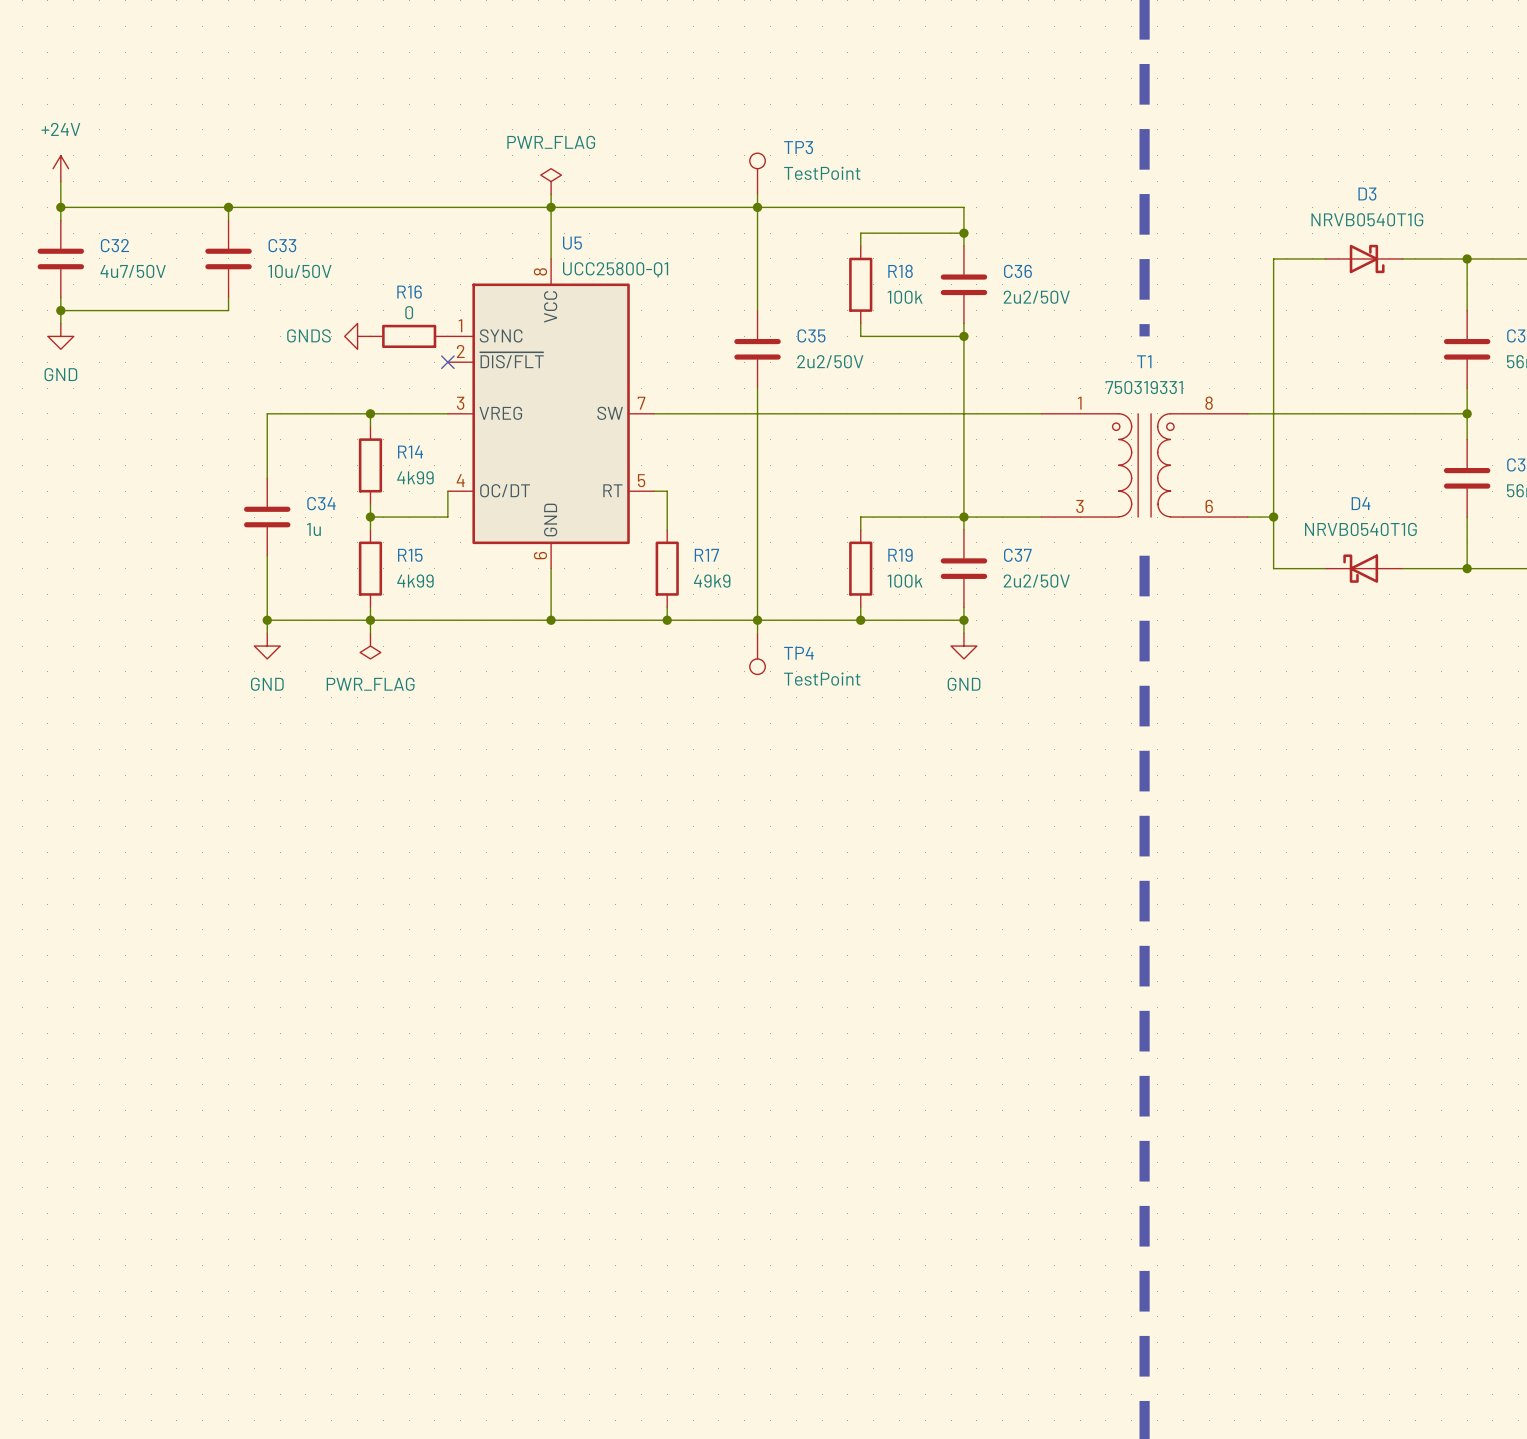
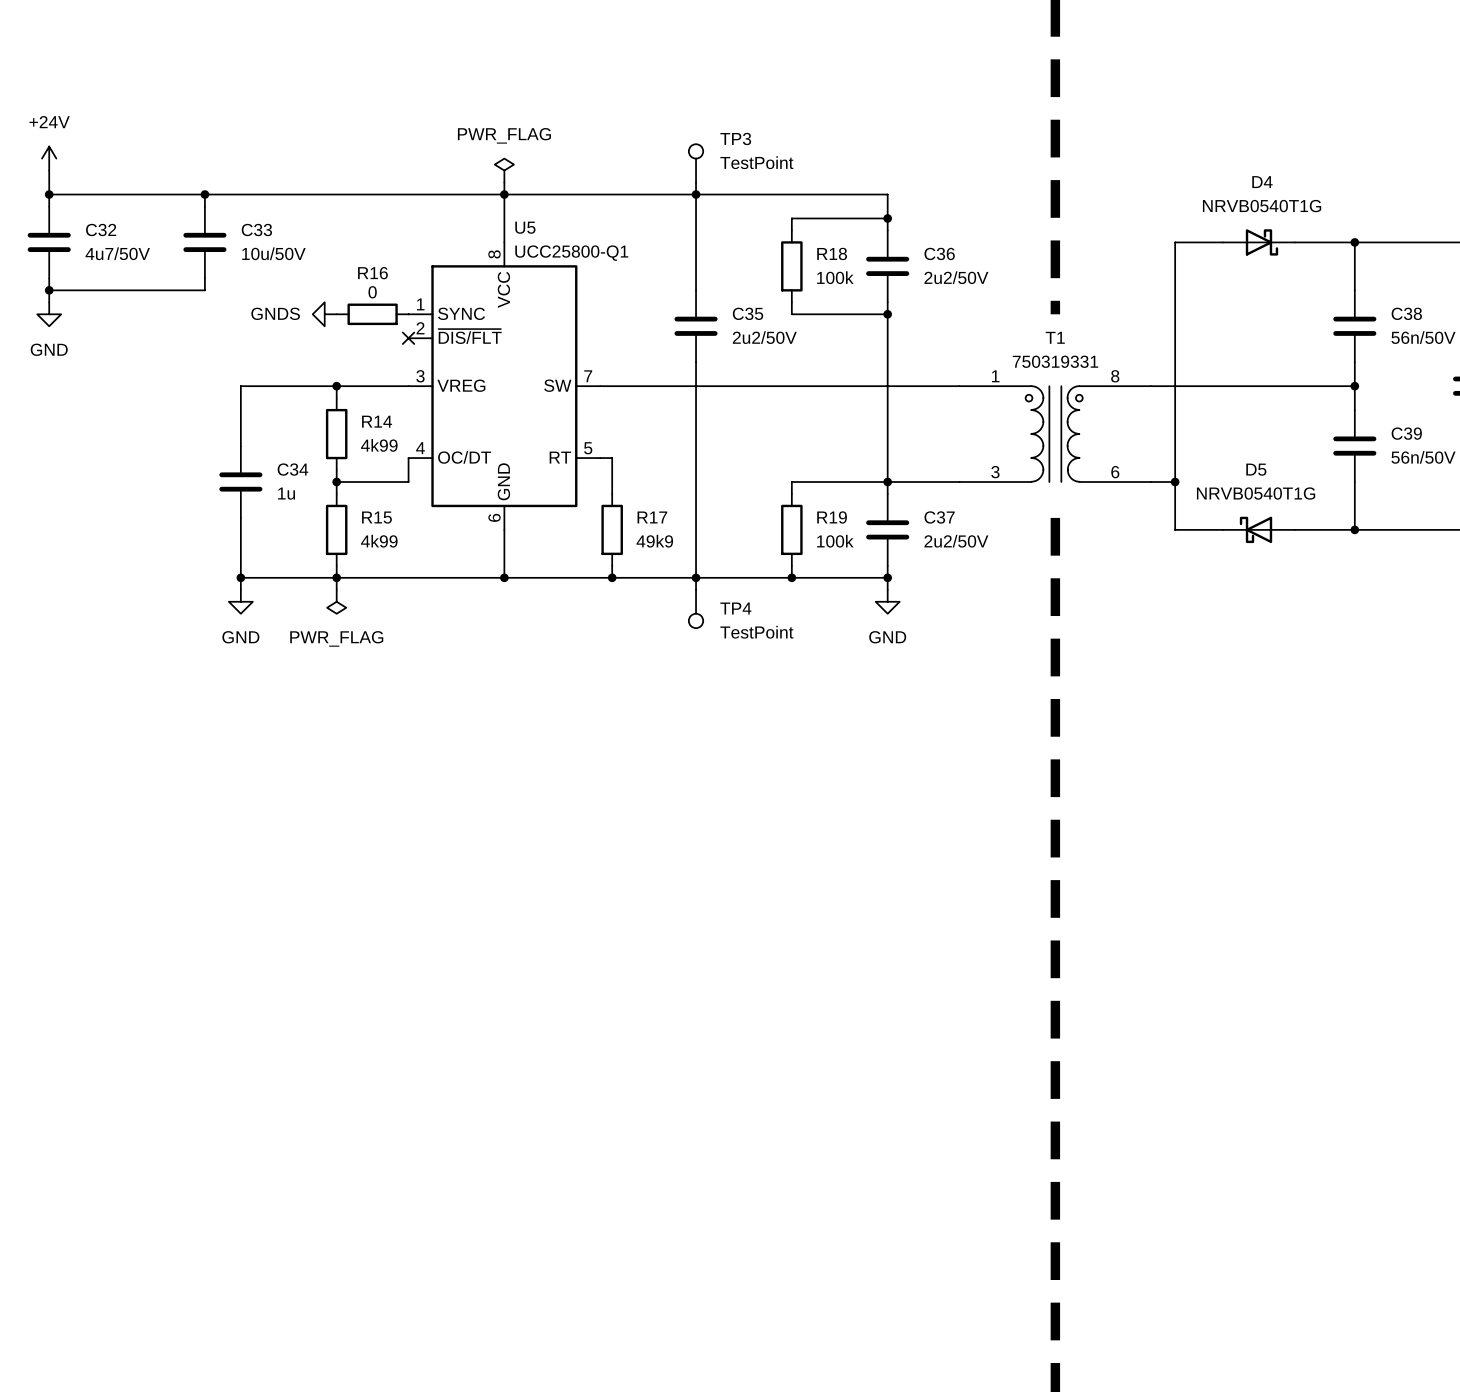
D3 name: D3 (1367, 194) -> D4 (1262, 182)
D4 name: D4 (1361, 503) -> D5 (1256, 469)

